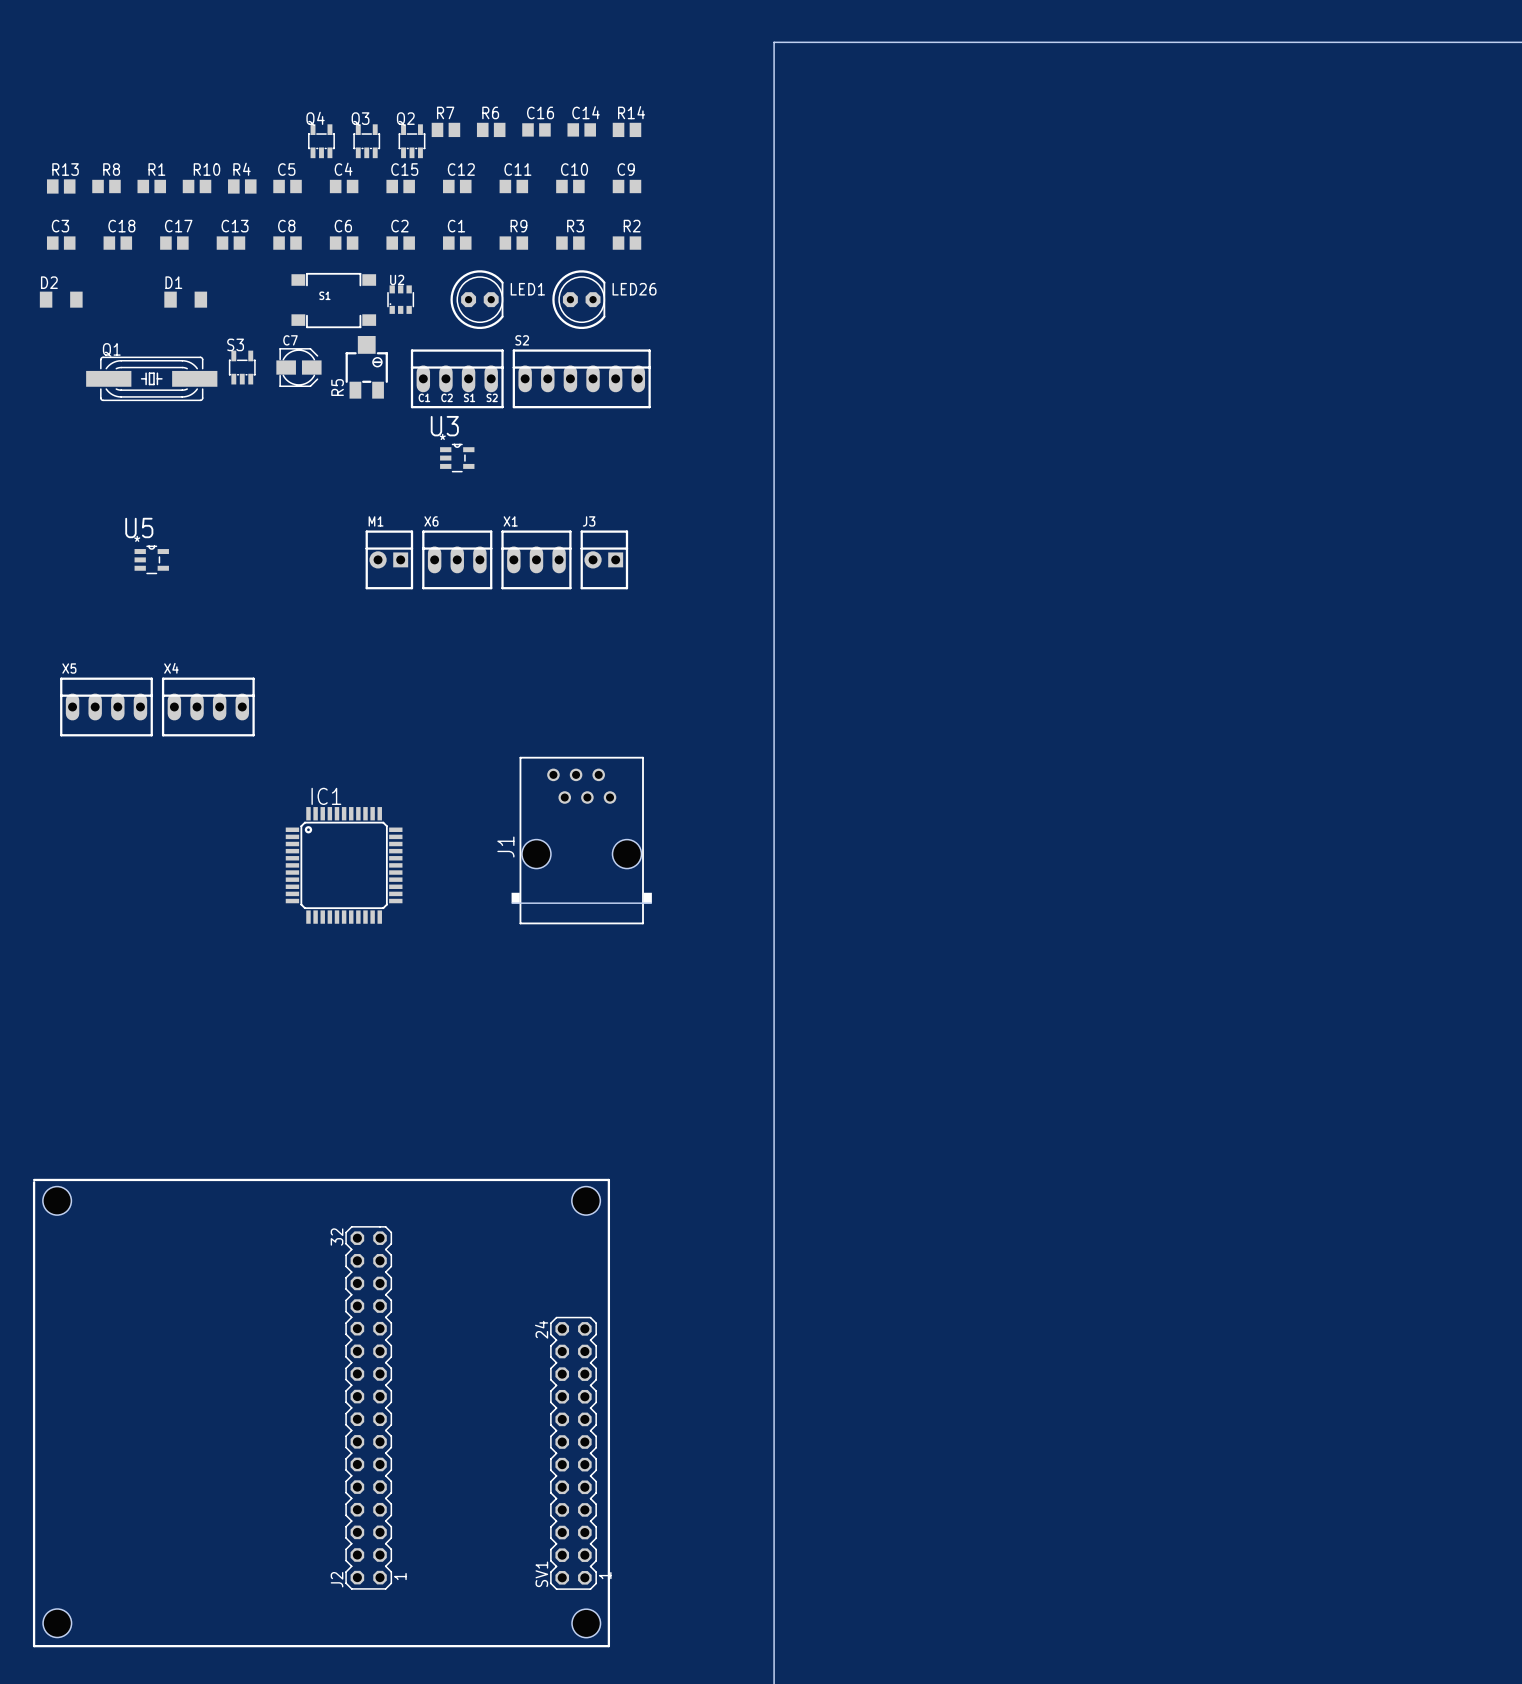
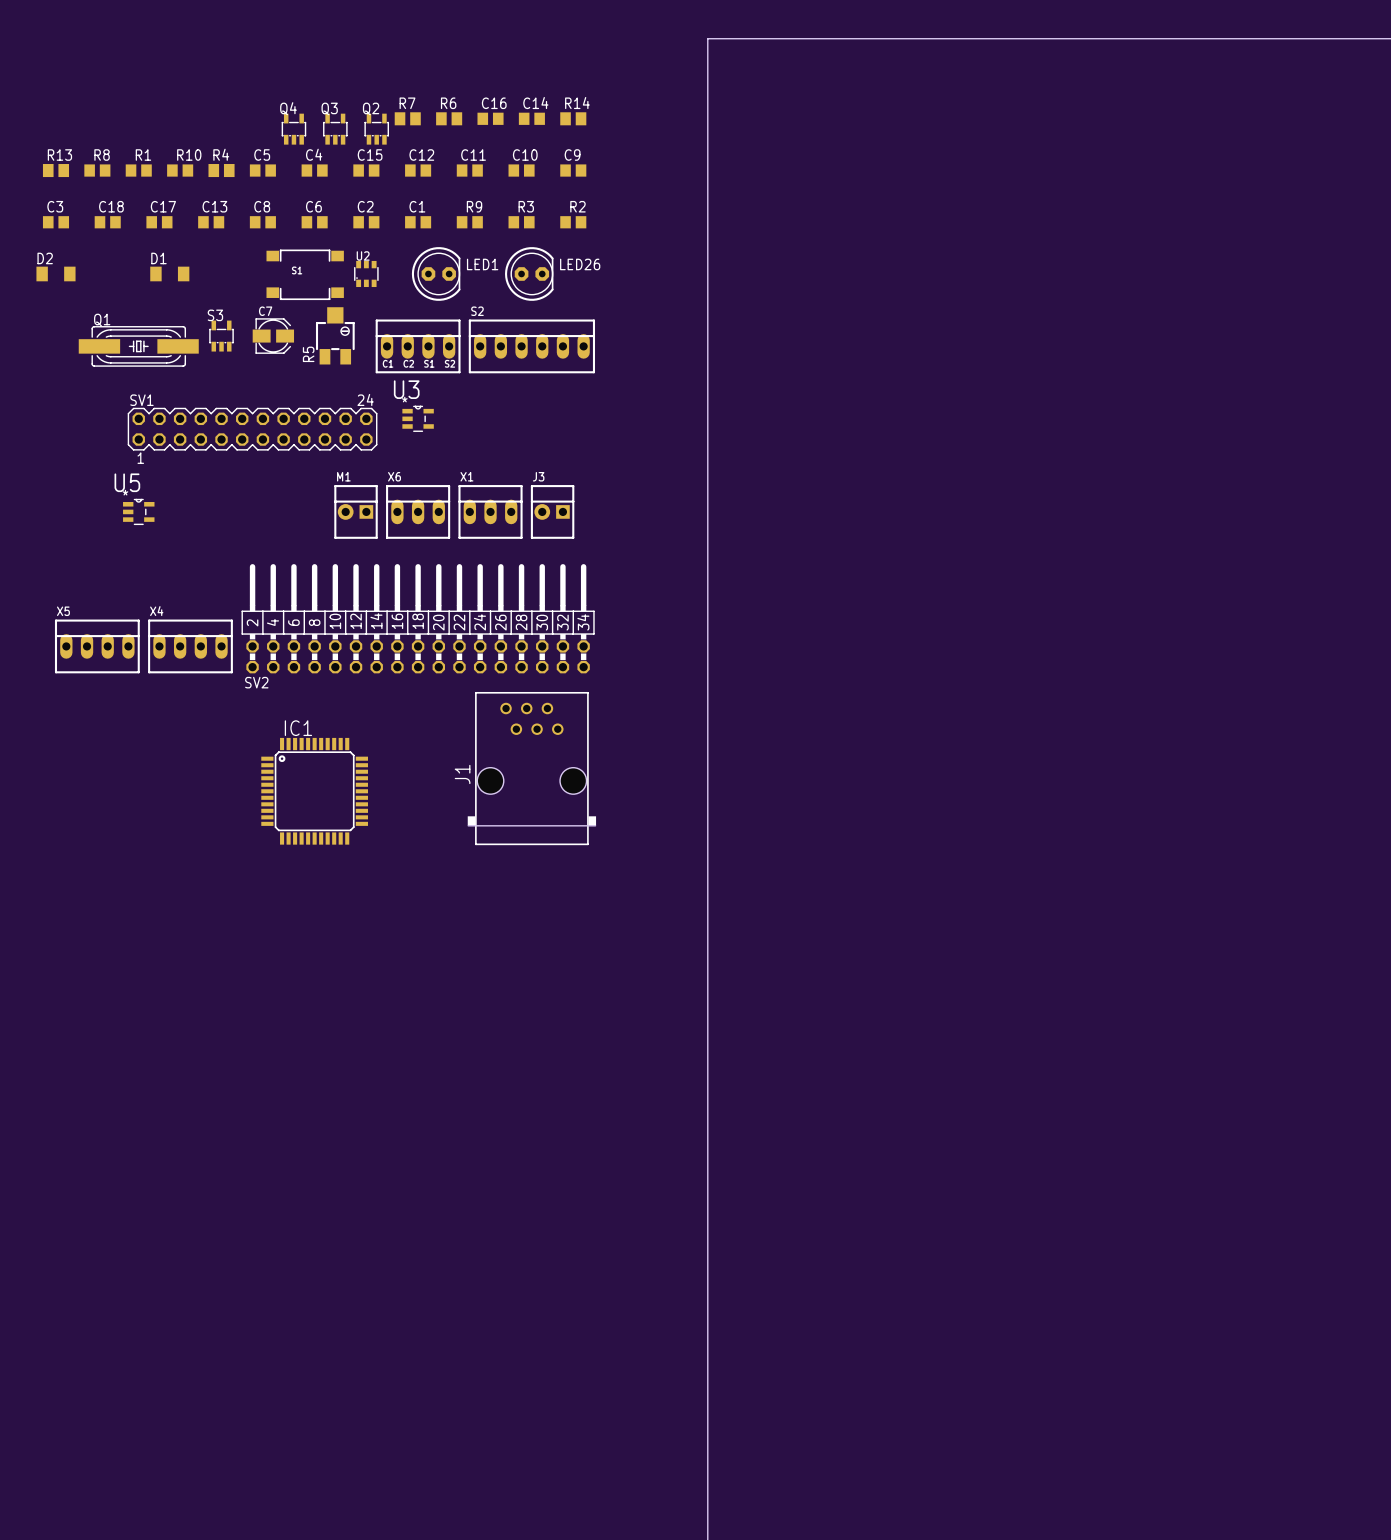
SV2: none -> (418, 618)
line: (34, 1179) (608, 1179) (608, 1646) (34, 1646) (34, 1182) -> none
hole: (57, 1200) -> none
hole: (586, 1200) -> none
J2: (368, 1407) -> none
SV1 rotation: 0° (573, 1453) -> 90° clockwise (252, 429)
SV1 position: (573, 1453) -> (252, 429)
hole: (57, 1623) -> none
hole: (586, 1623) -> none

